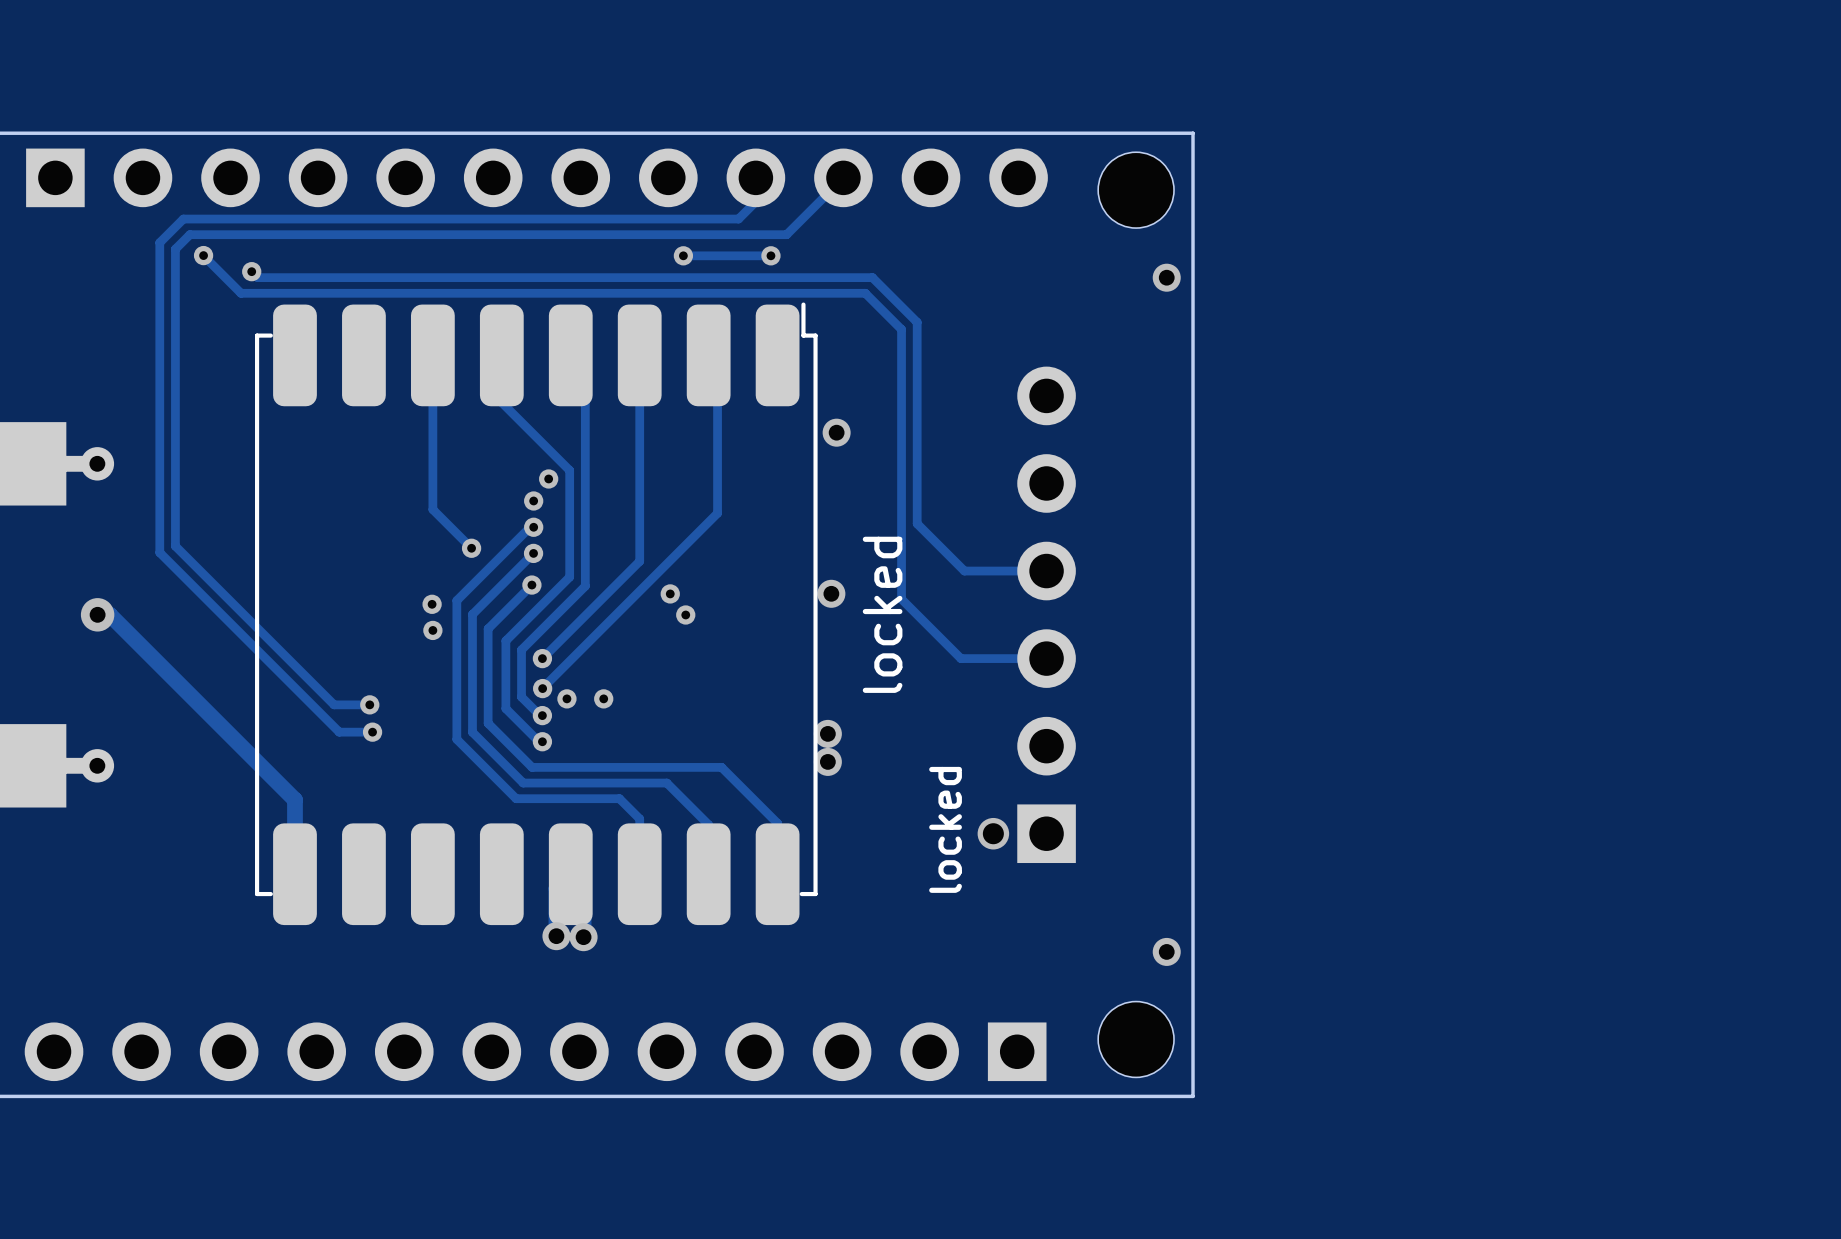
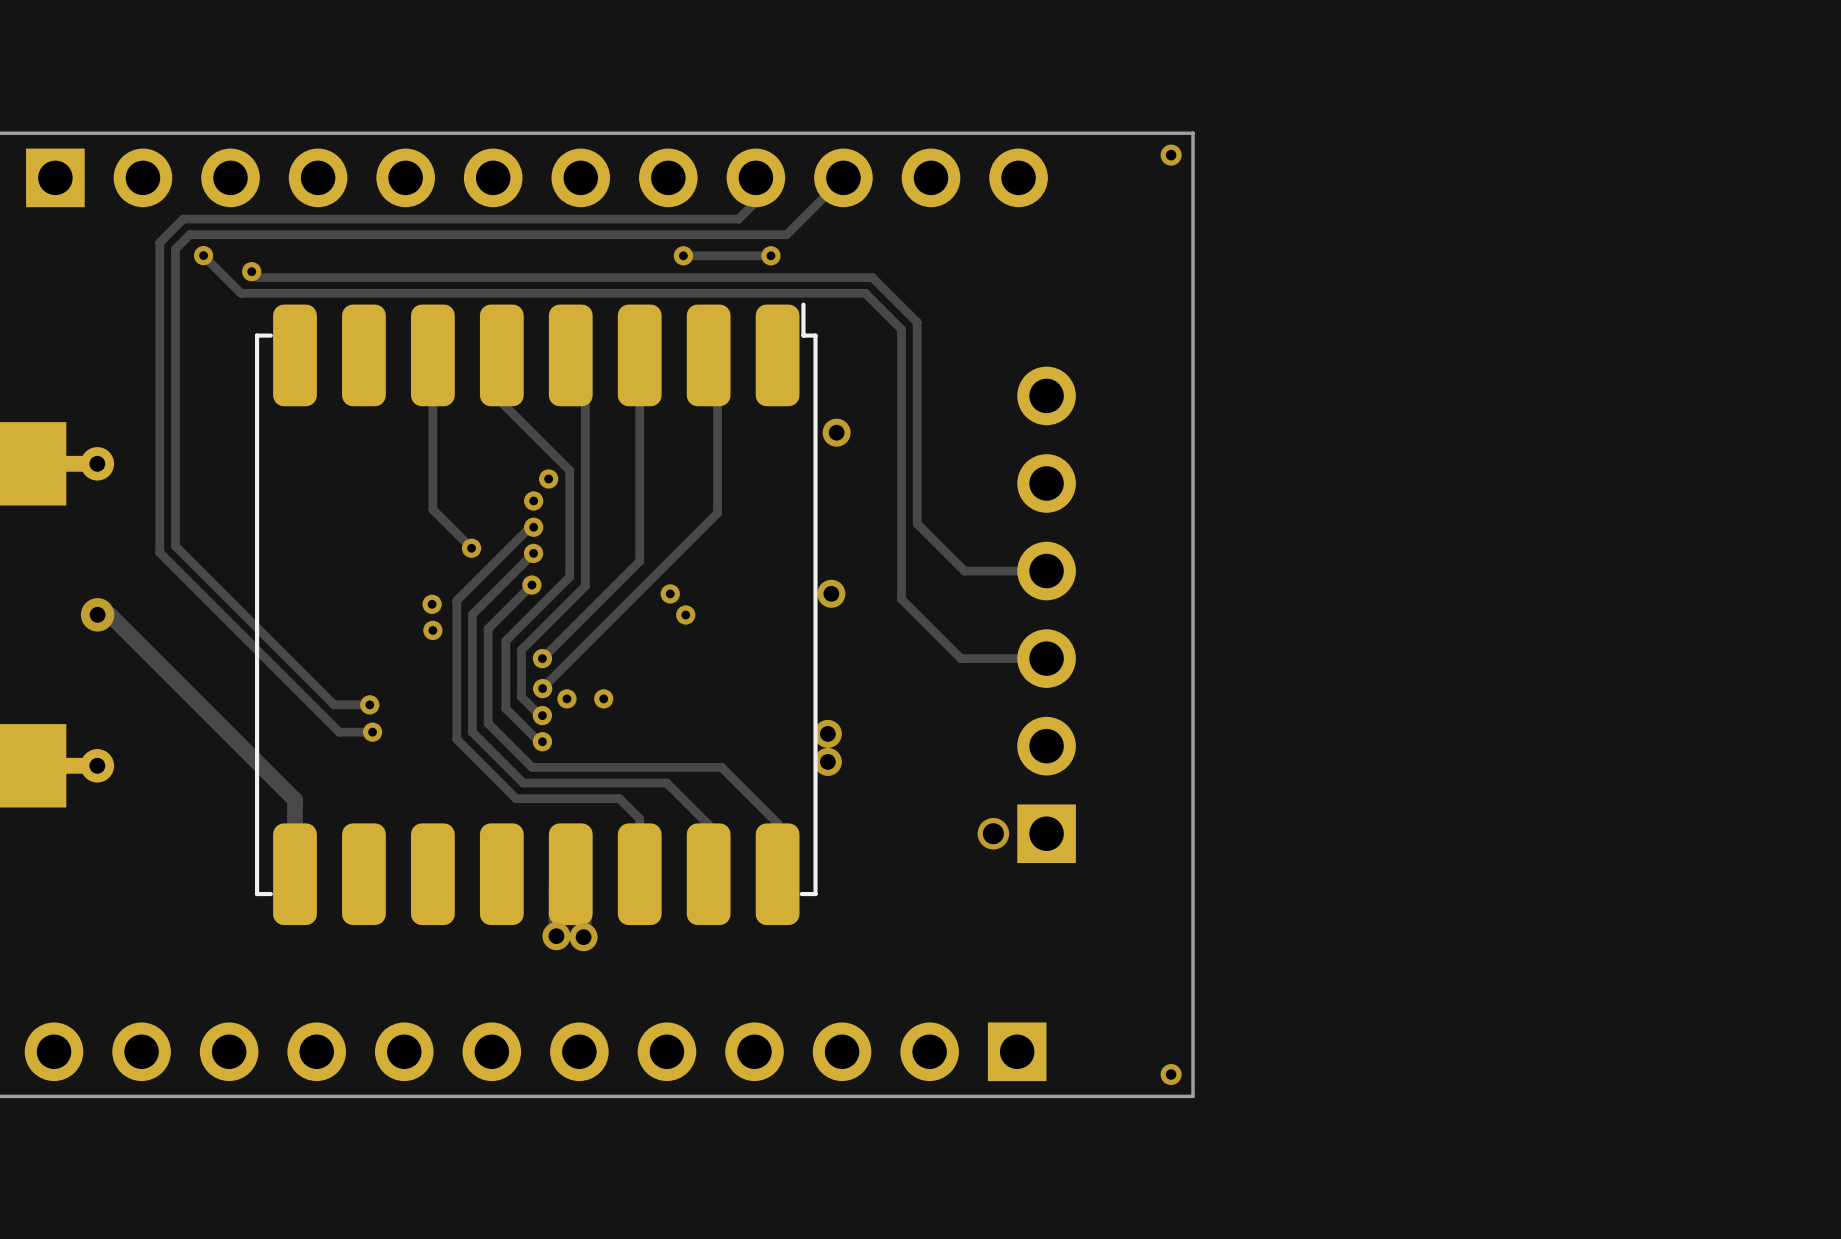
via: none -> (1171, 155)
part: (1136, 190) -> none
via: (1166, 277) -> none
text: locked (882, 614) -> none
text: locked (945, 829) -> none
via: (1166, 951) -> none
part: (1136, 1039) -> none
via: none -> (1171, 1074)

